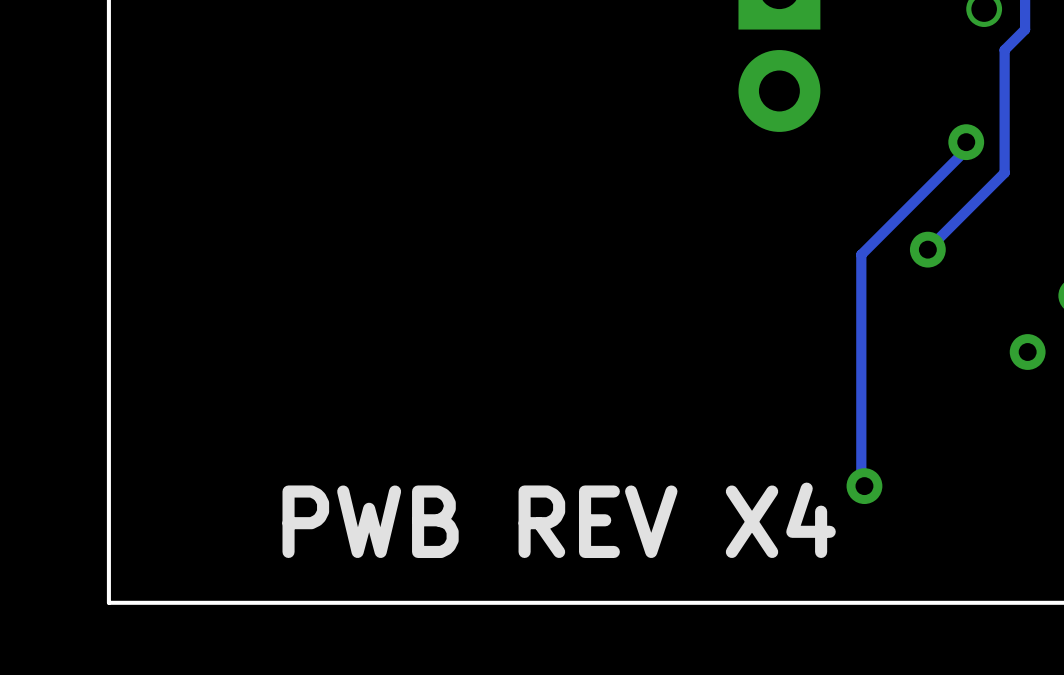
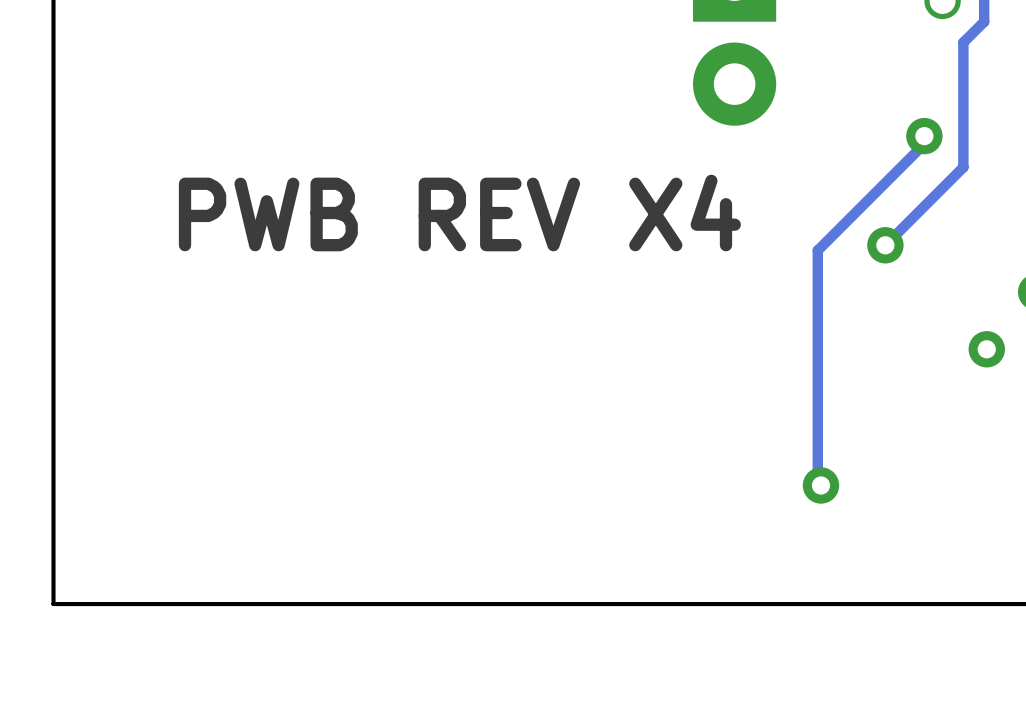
text position: PWB REV X4 (559, 520) -> PWB REV X4 (459, 213)

